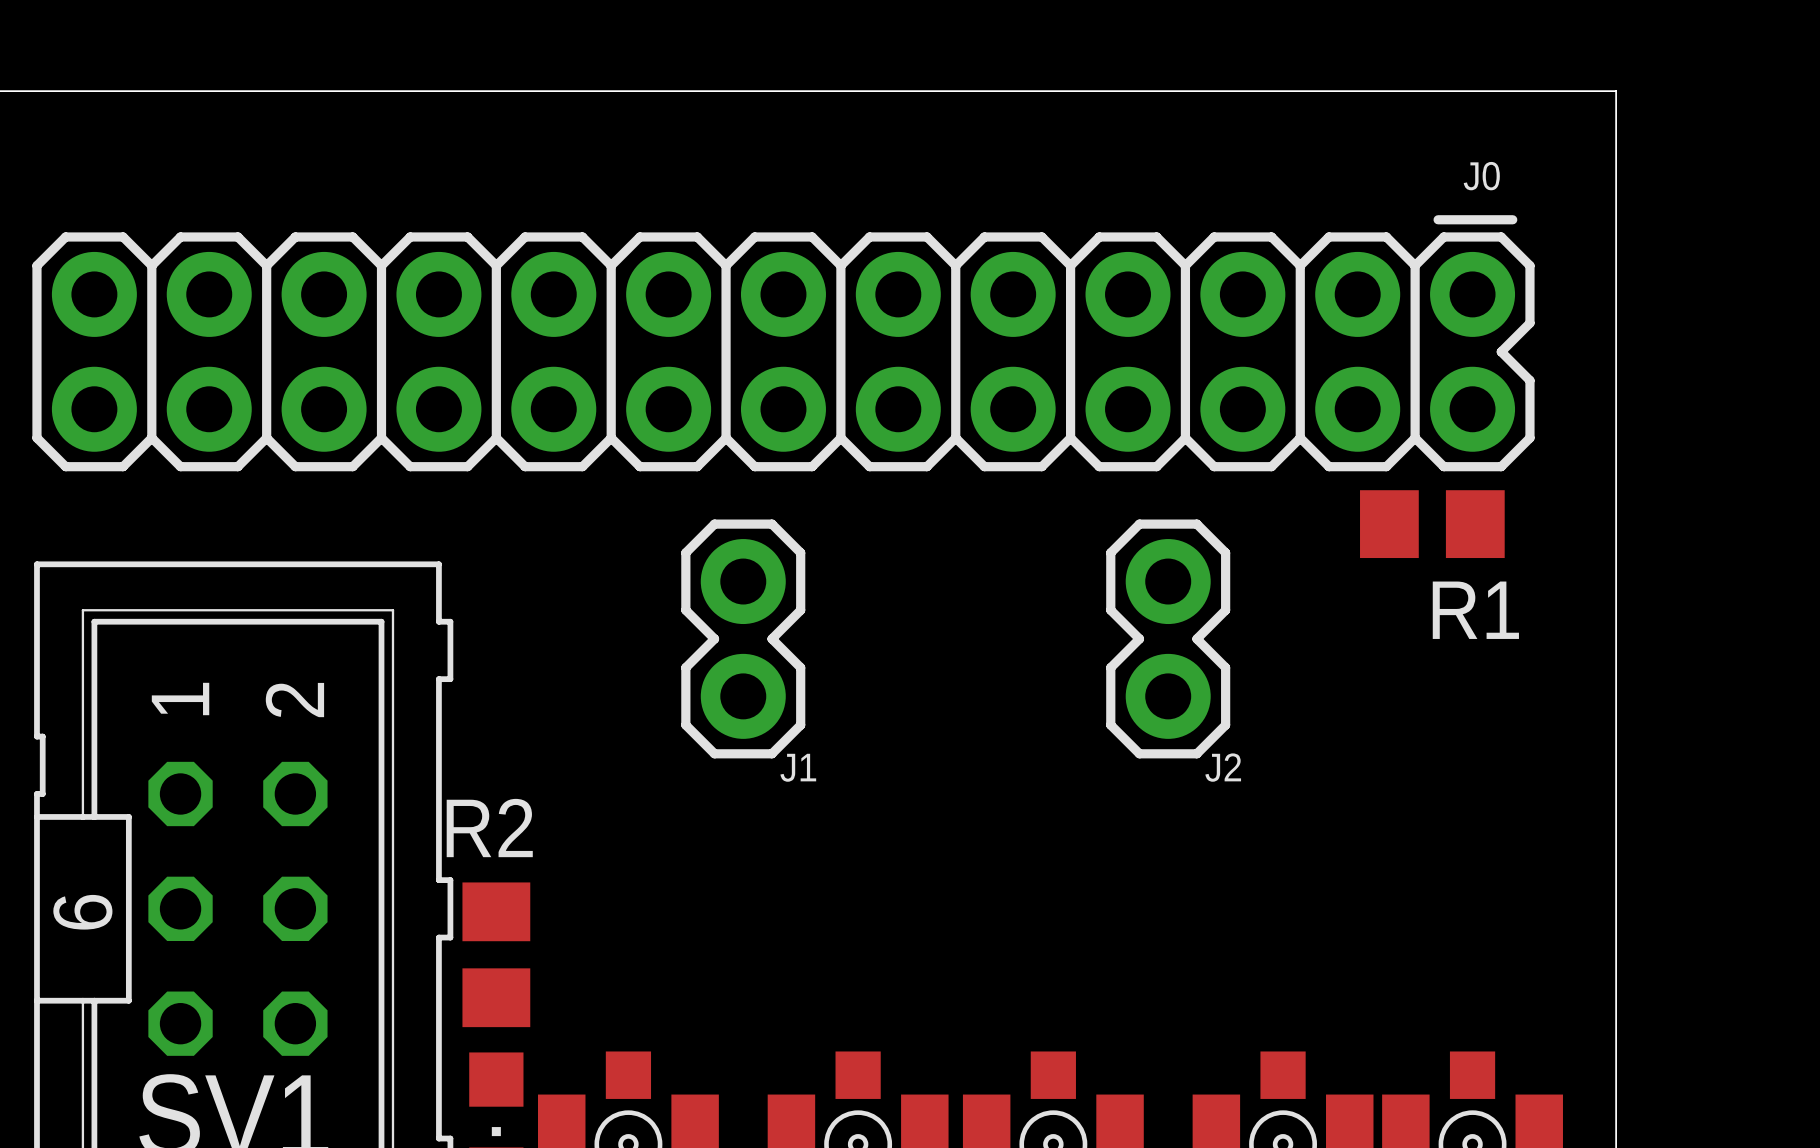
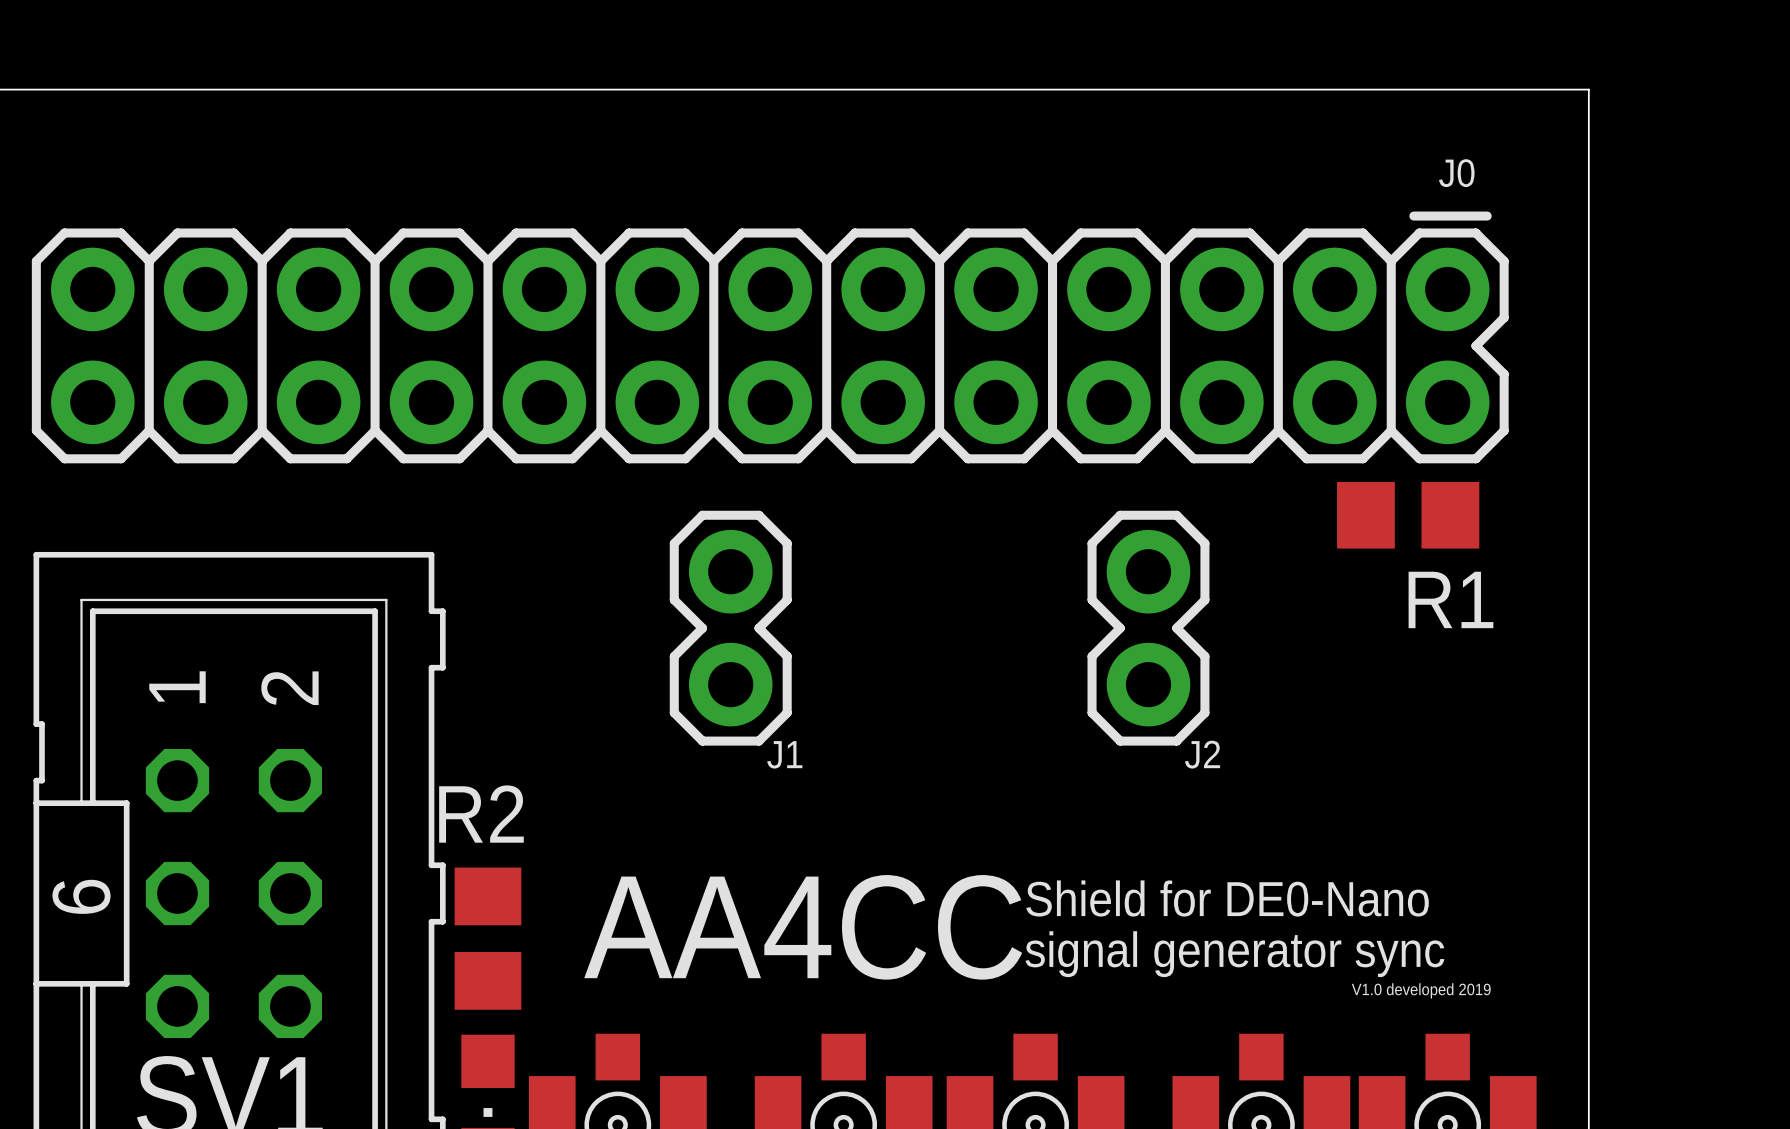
text: none -> Shield for DE0-Nano (1227, 898)
text: none -> AA4CC (803, 927)
text: none -> signal generator sync (1234, 954)
text: none -> V1.0 developed 2019 (1421, 990)

